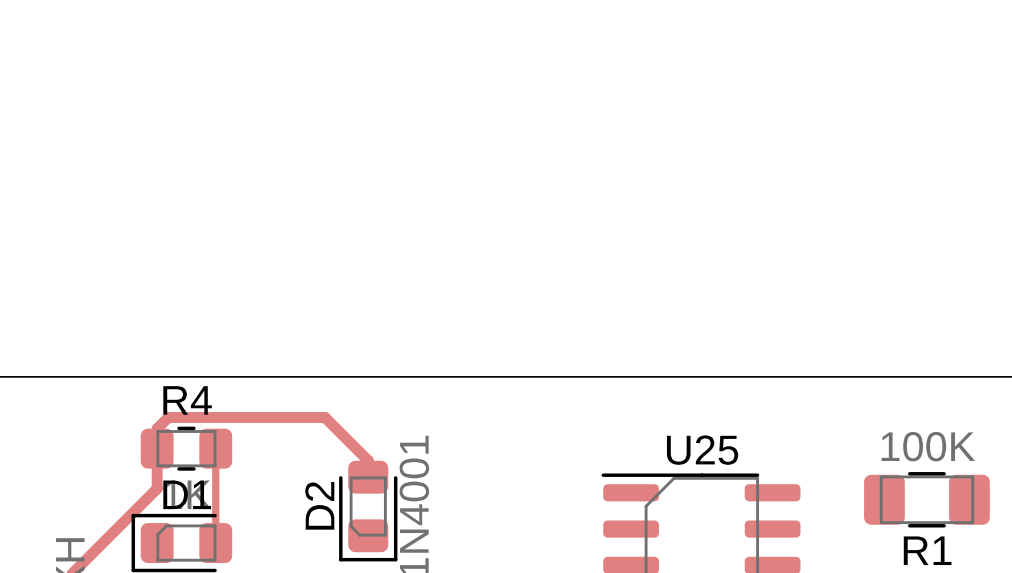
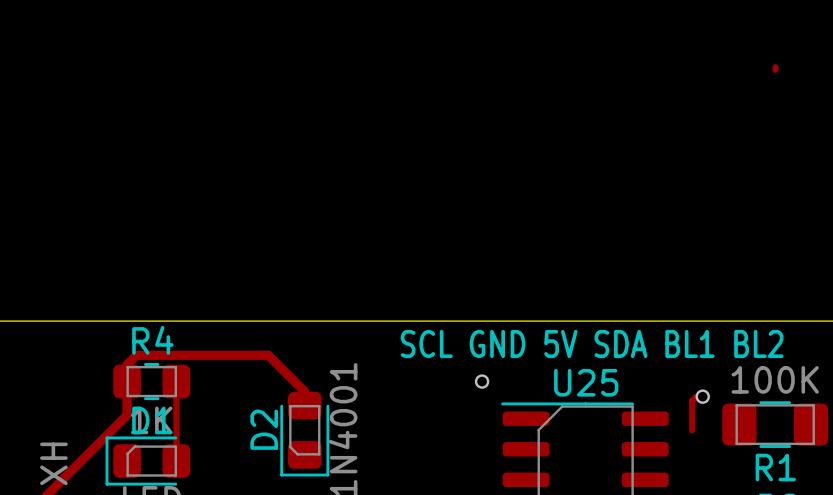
track: none -> (775, 67) (775, 69)
text: none -> SCL GND 5V SDA BL1 BL2 (592, 343)
via: none -> (482, 381)
track: none -> (702, 396) (696, 396) (692, 400) (692, 430)
via: none -> (702, 396)

